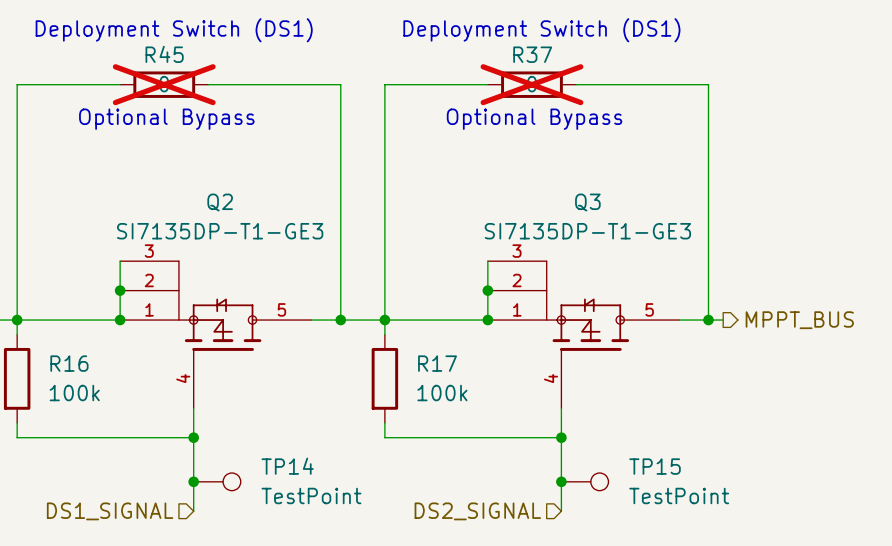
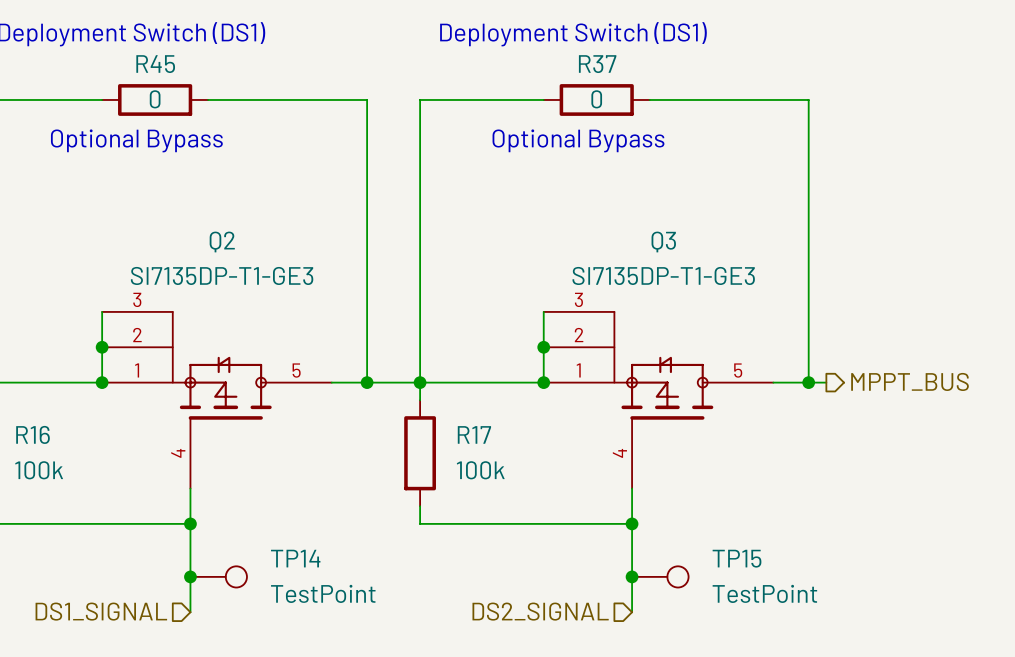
R45 do-not-place cross: (164, 84) -> none
R37 do-not-place cross: (531, 84) -> none

